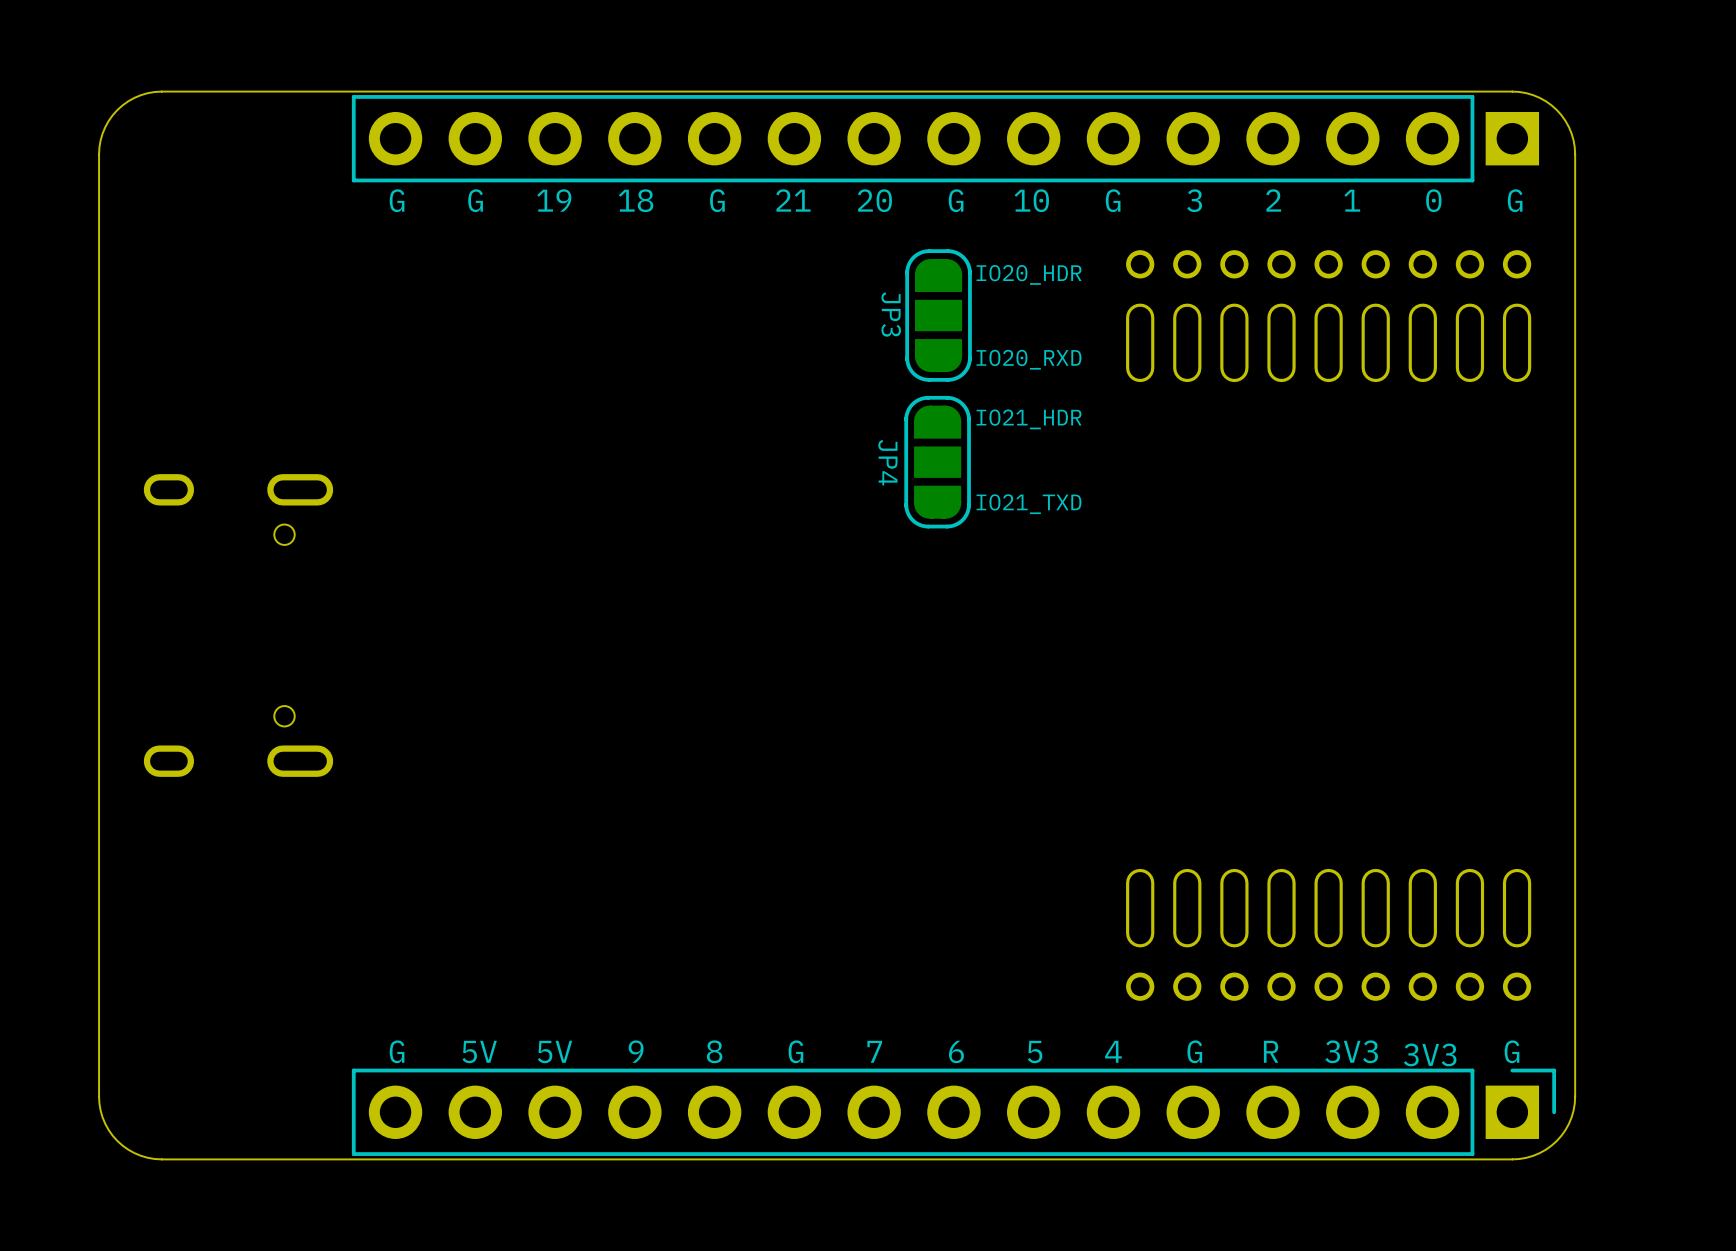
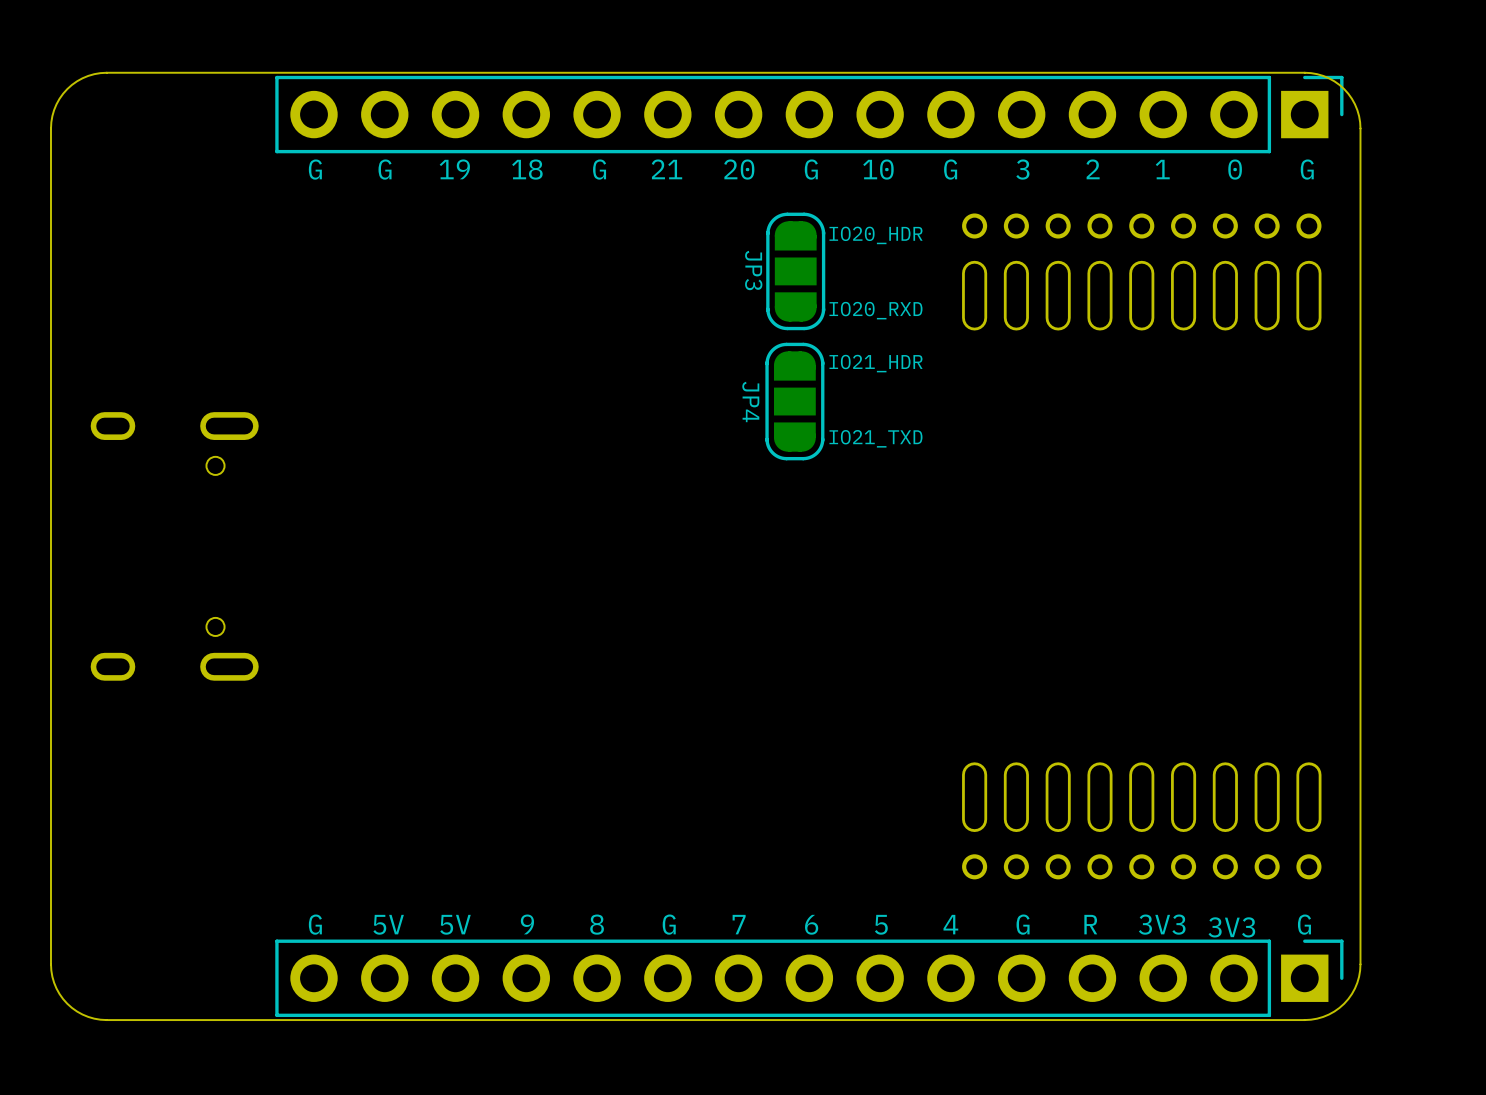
part footprint: [351, 95, 1540, 183] -> [275, 75, 1344, 154]

